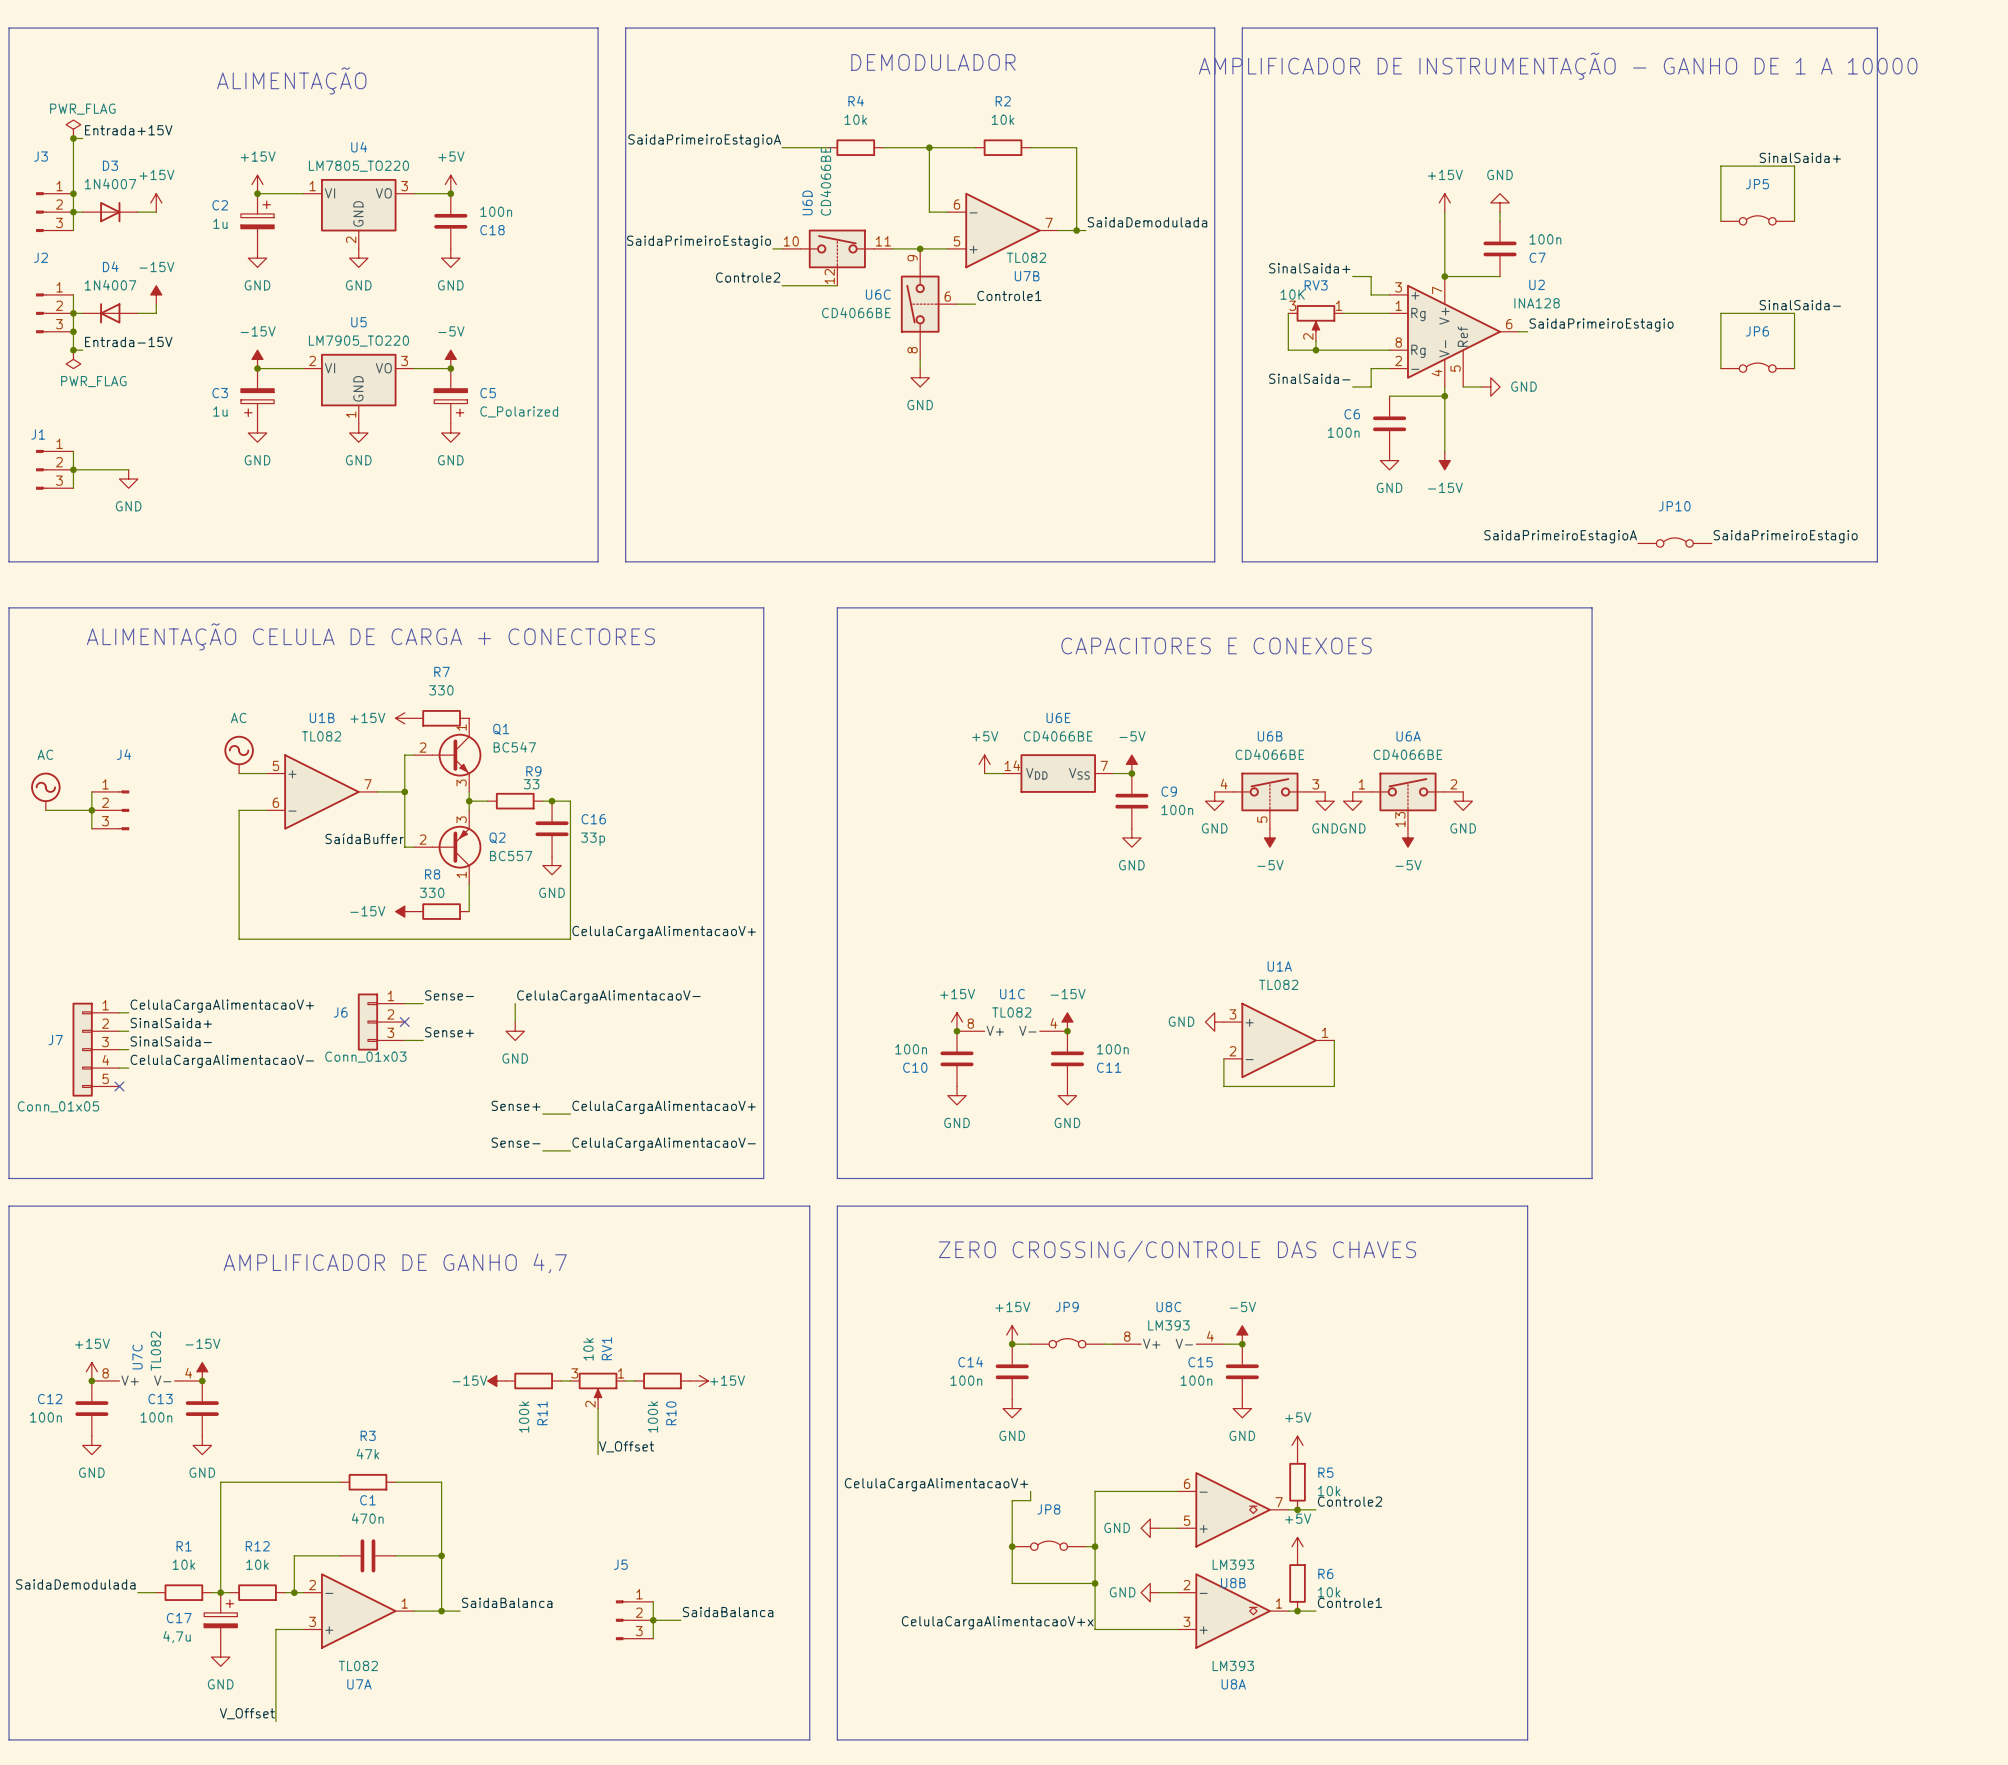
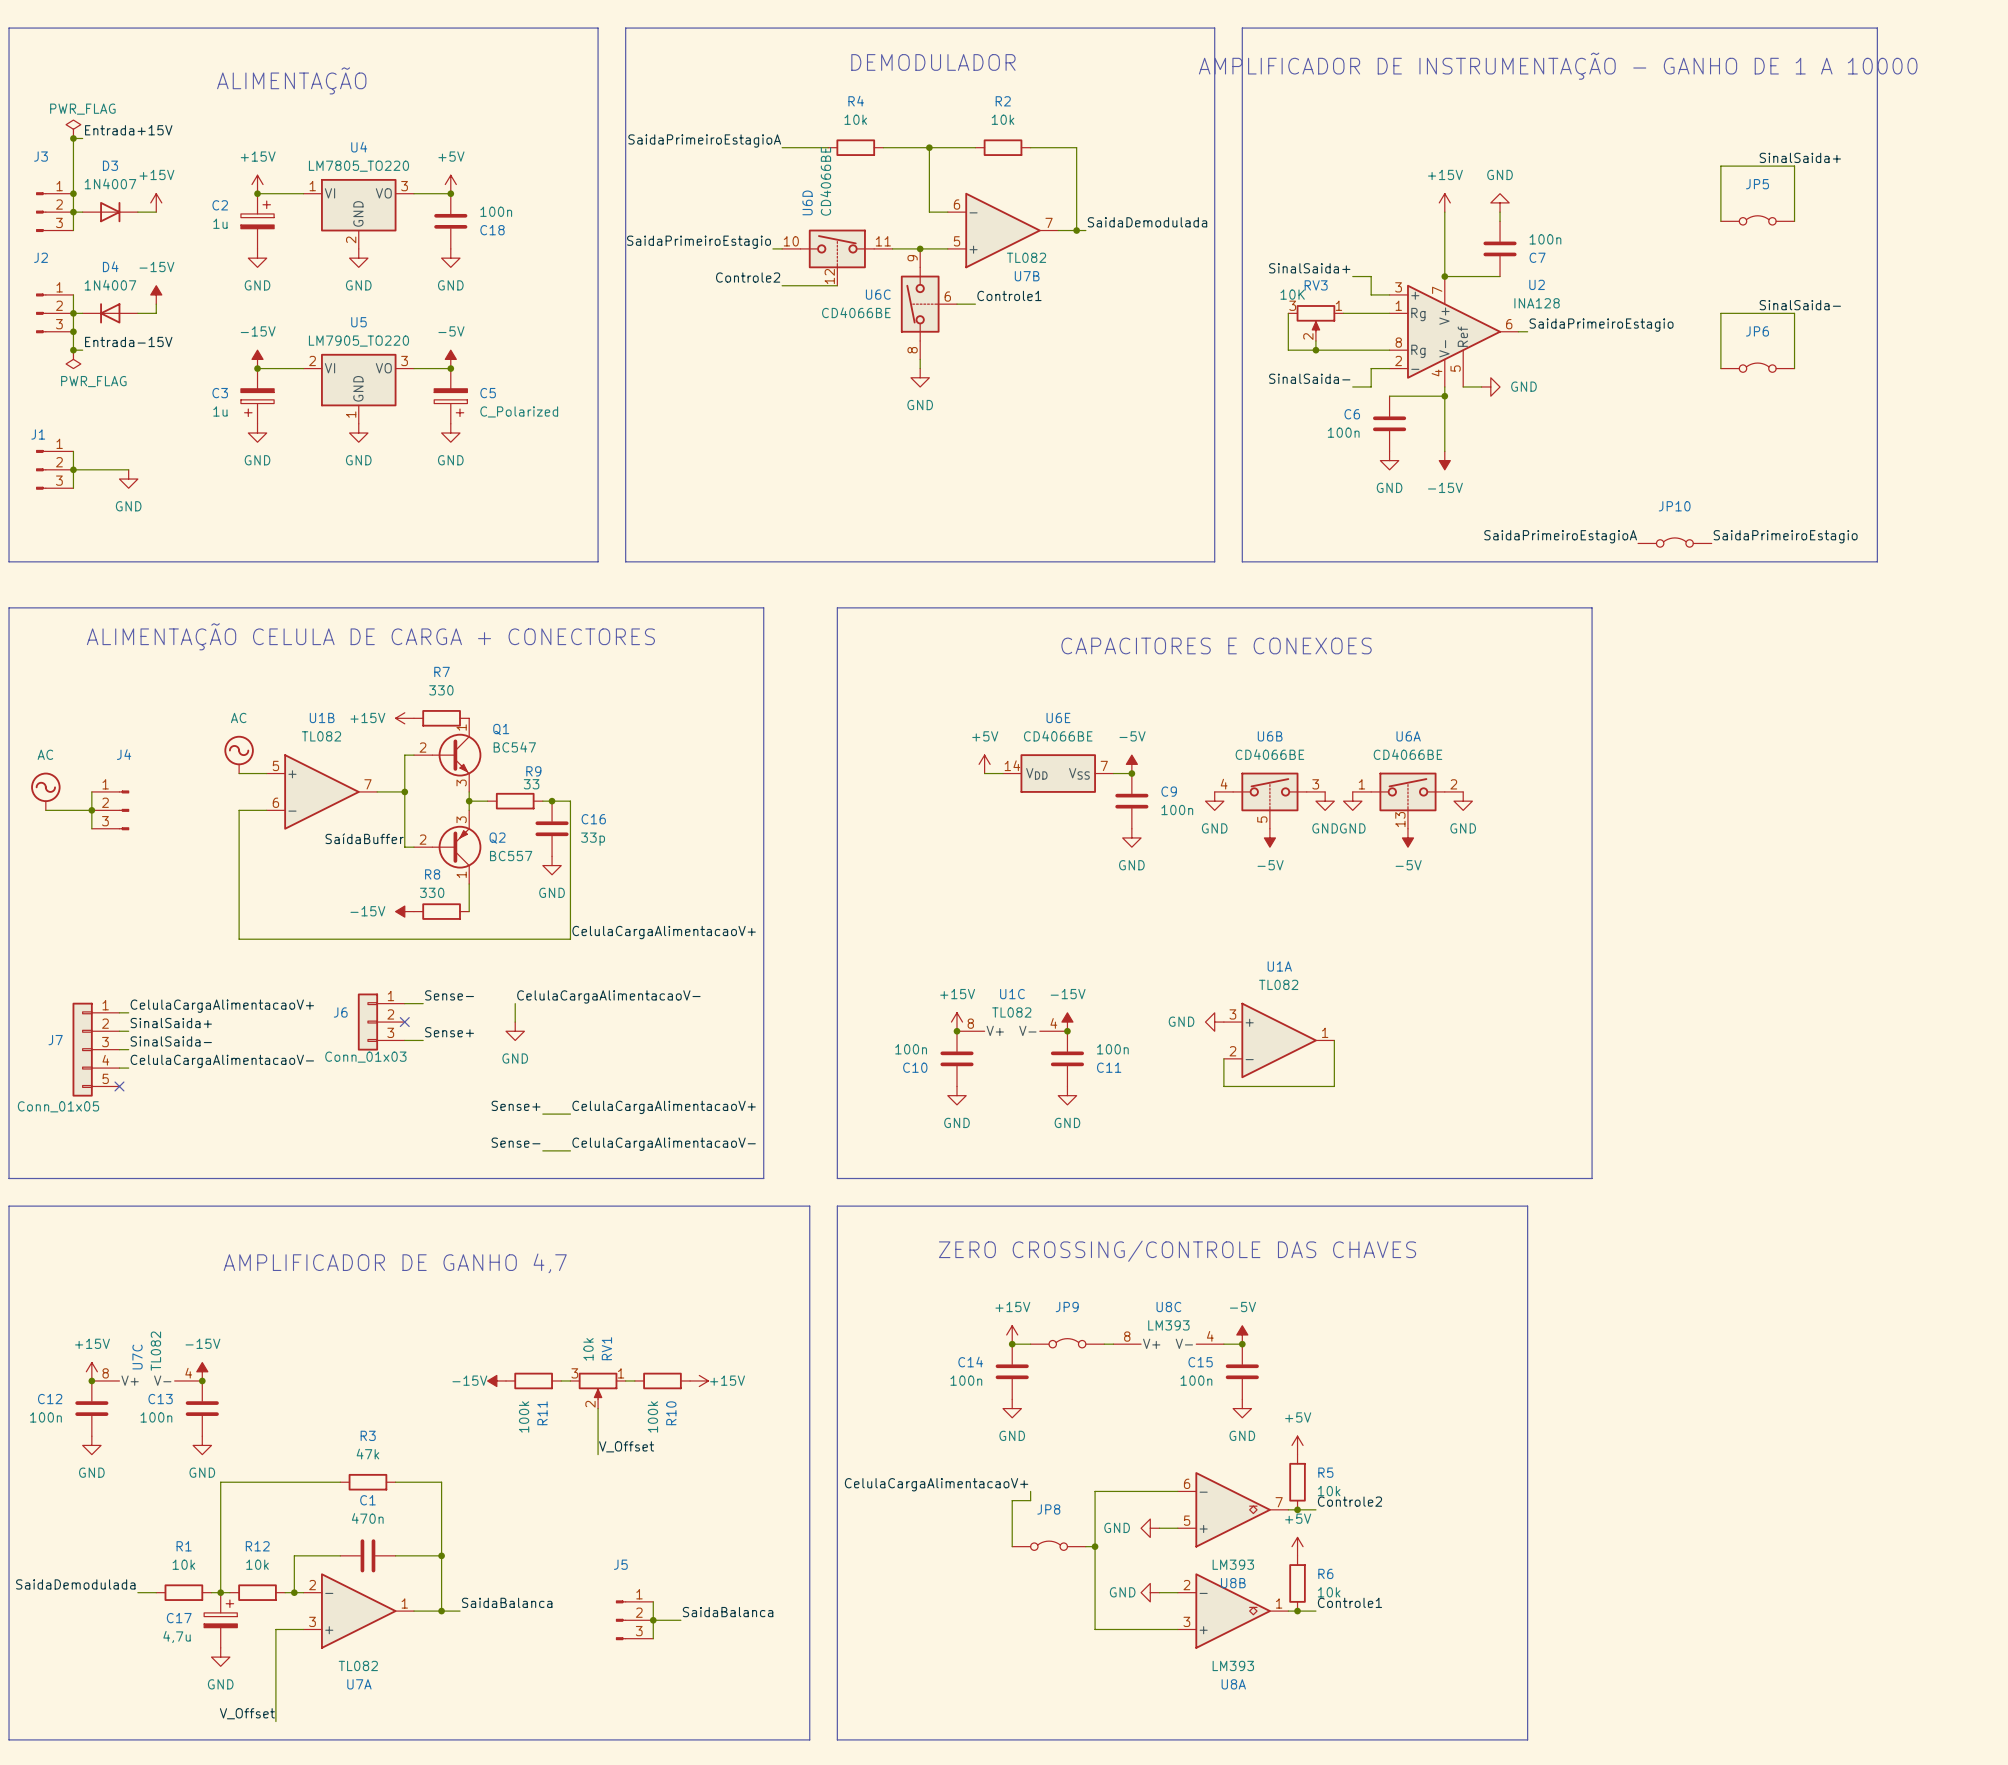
wire: (1012, 1546) (1012, 1583) (1095, 1583) -> none
junction: (1012, 1546) -> none
junction: (1095, 1583) -> none
label: CelulaCargaAlimentacaoV+x (997, 1622) -> none

